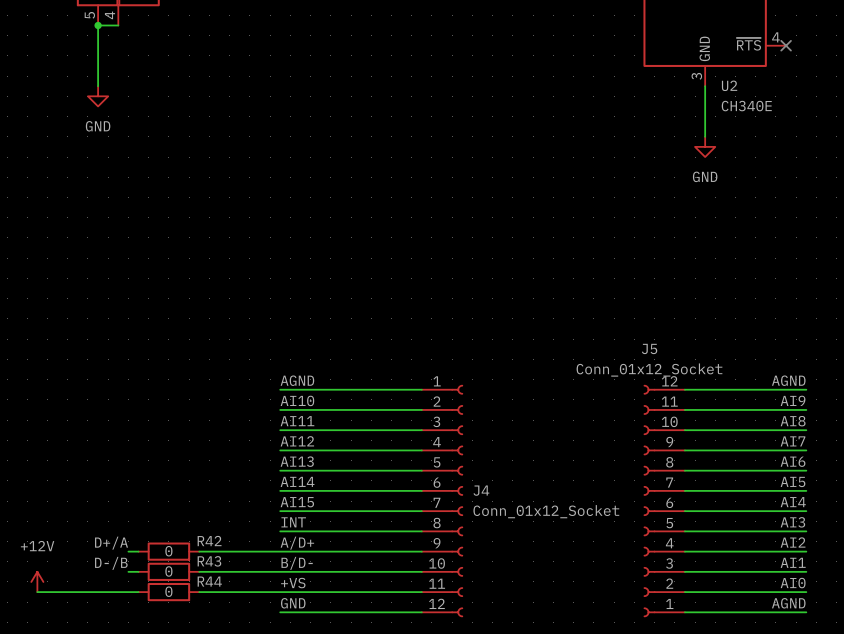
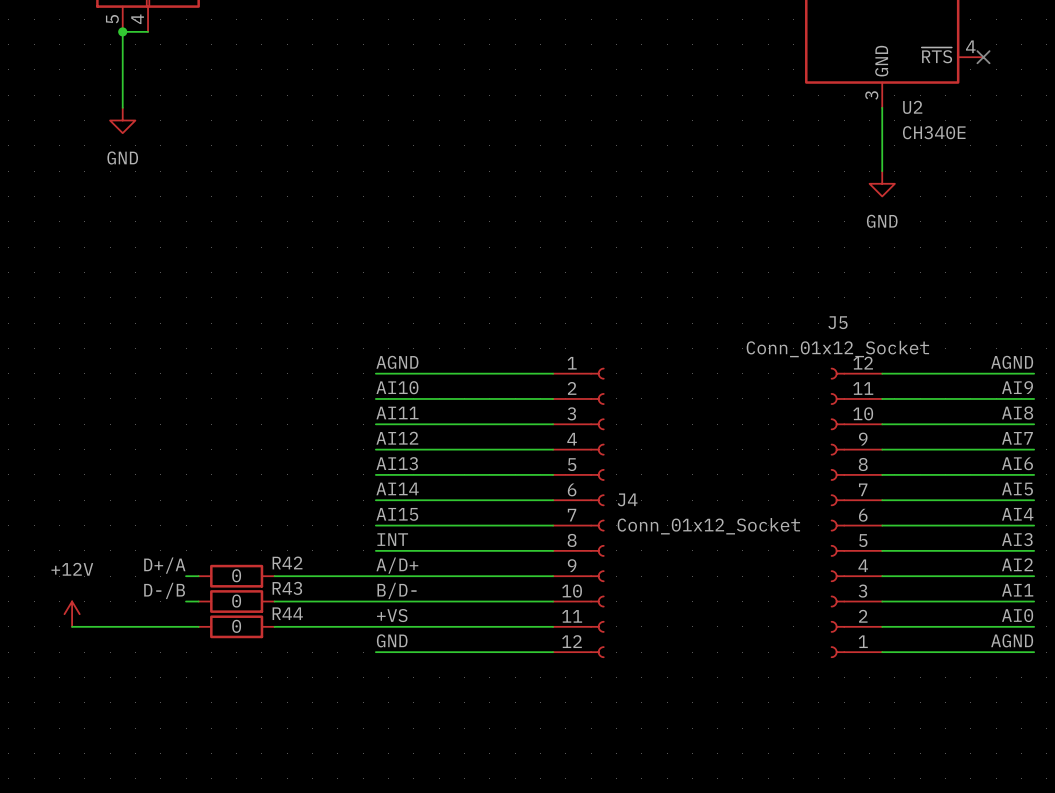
label: none -> AGND (1012, 362)
label position: AGND (297, 380) -> AGND (397, 362)
label: AGND (788, 380) -> none
wire: (280, 389) (421, 389) -> (375, 373) (553, 373)
wire: (684, 389) (806, 389) -> (882, 373) (1034, 373)
label position: AI10 (297, 400) -> AI10 (397, 387)
label position: AI9 (793, 400) -> AI9 (1017, 387)
wire: (280, 409) (421, 409) -> (375, 398) (553, 398)
wire: (684, 409) (806, 409) -> (882, 398) (1034, 398)
label position: AI11 (297, 421) -> AI11 (397, 413)
label position: AI8 (793, 421) -> AI8 (1017, 413)
wire: (280, 430) (421, 430) -> (375, 424) (553, 424)
wire: (684, 430) (806, 430) -> (882, 424) (1034, 424)
label position: AI12 (297, 441) -> AI12 (397, 438)
label position: AI7 (793, 441) -> AI7 (1017, 438)
wire: (280, 450) (421, 450) -> (375, 449) (553, 449)
wire: (684, 450) (806, 450) -> (882, 449) (1034, 449)
label position: AI13 (297, 461) -> AI13 (397, 463)
label position: AI6 (793, 461) -> AI6 (1017, 463)
wire: (280, 470) (421, 470) -> (375, 474) (553, 474)
wire: (684, 470) (806, 470) -> (882, 474) (1034, 474)
label position: AI14 (297, 481) -> AI14 (397, 488)
label position: AI5 (793, 481) -> AI5 (1017, 489)
wire: (280, 490) (421, 490) -> (375, 500) (553, 500)
wire: (684, 490) (806, 490) -> (882, 500) (1034, 500)
J4 position: (442, 501) -> (578, 512)
J5 position: (664, 501) -> (856, 512)
label position: AI15 (297, 502) -> AI15 (397, 514)
label position: AI4 (793, 502) -> AI4 (1017, 514)
wire: (280, 511) (421, 511) -> (375, 525) (553, 525)
wire: (684, 511) (806, 511) -> (882, 525) (1034, 525)
label: none -> AGND (1012, 640)
label position: INT (293, 522) -> INT (392, 539)
label position: AI3 (792, 522) -> AI3 (1017, 539)
wire: (280, 531) (421, 531) -> (375, 550) (553, 550)
wire: (684, 531) (806, 531) -> (882, 550) (1034, 550)
label position: AI2 (793, 542) -> AI2 (1017, 564)
label position: D+/A (111, 543) -> D+/A (164, 565)
label position: A/D+ (297, 543) -> A/D+ (397, 565)
wire: (128, 551) (138, 551) -> (186, 576) (198, 576)
R42 position: (168, 551) -> (236, 576)
wire: (199, 551) (421, 551) -> (274, 576) (553, 576)
wire: (684, 551) (806, 551) -> (882, 576) (1034, 576)
label position: AI1 (793, 562) -> AI1 (1017, 590)
label position: D-/B (111, 563) -> D-/B (164, 590)
label position: B/D- (297, 563) -> B/D- (397, 590)
wire: (128, 571) (138, 571) -> (186, 601) (198, 601)
R43 position: (168, 571) -> (236, 601)
wire: (199, 571) (421, 571) -> (274, 601) (553, 601)
wire: (684, 571) (806, 571) -> (882, 601) (1034, 601)
power symbol position: +12V (37, 581) -> +12V (72, 614)
label position: +VS (293, 583) -> +VS (392, 615)
label position: AI0 (793, 583) -> AI0 (1017, 615)
wire: (37, 592) (138, 592) -> (72, 626) (198, 626)
R44 position: (168, 592) -> (236, 626)
wire: (199, 592) (421, 592) -> (274, 626) (553, 626)
wire: (684, 592) (806, 592) -> (882, 626) (1034, 626)
label position: GND (293, 603) -> GND (392, 640)
label: AGND (788, 603) -> none
wire: (280, 612) (421, 612) -> (375, 652) (553, 652)
wire: (684, 612) (806, 612) -> (882, 652) (1034, 652)

